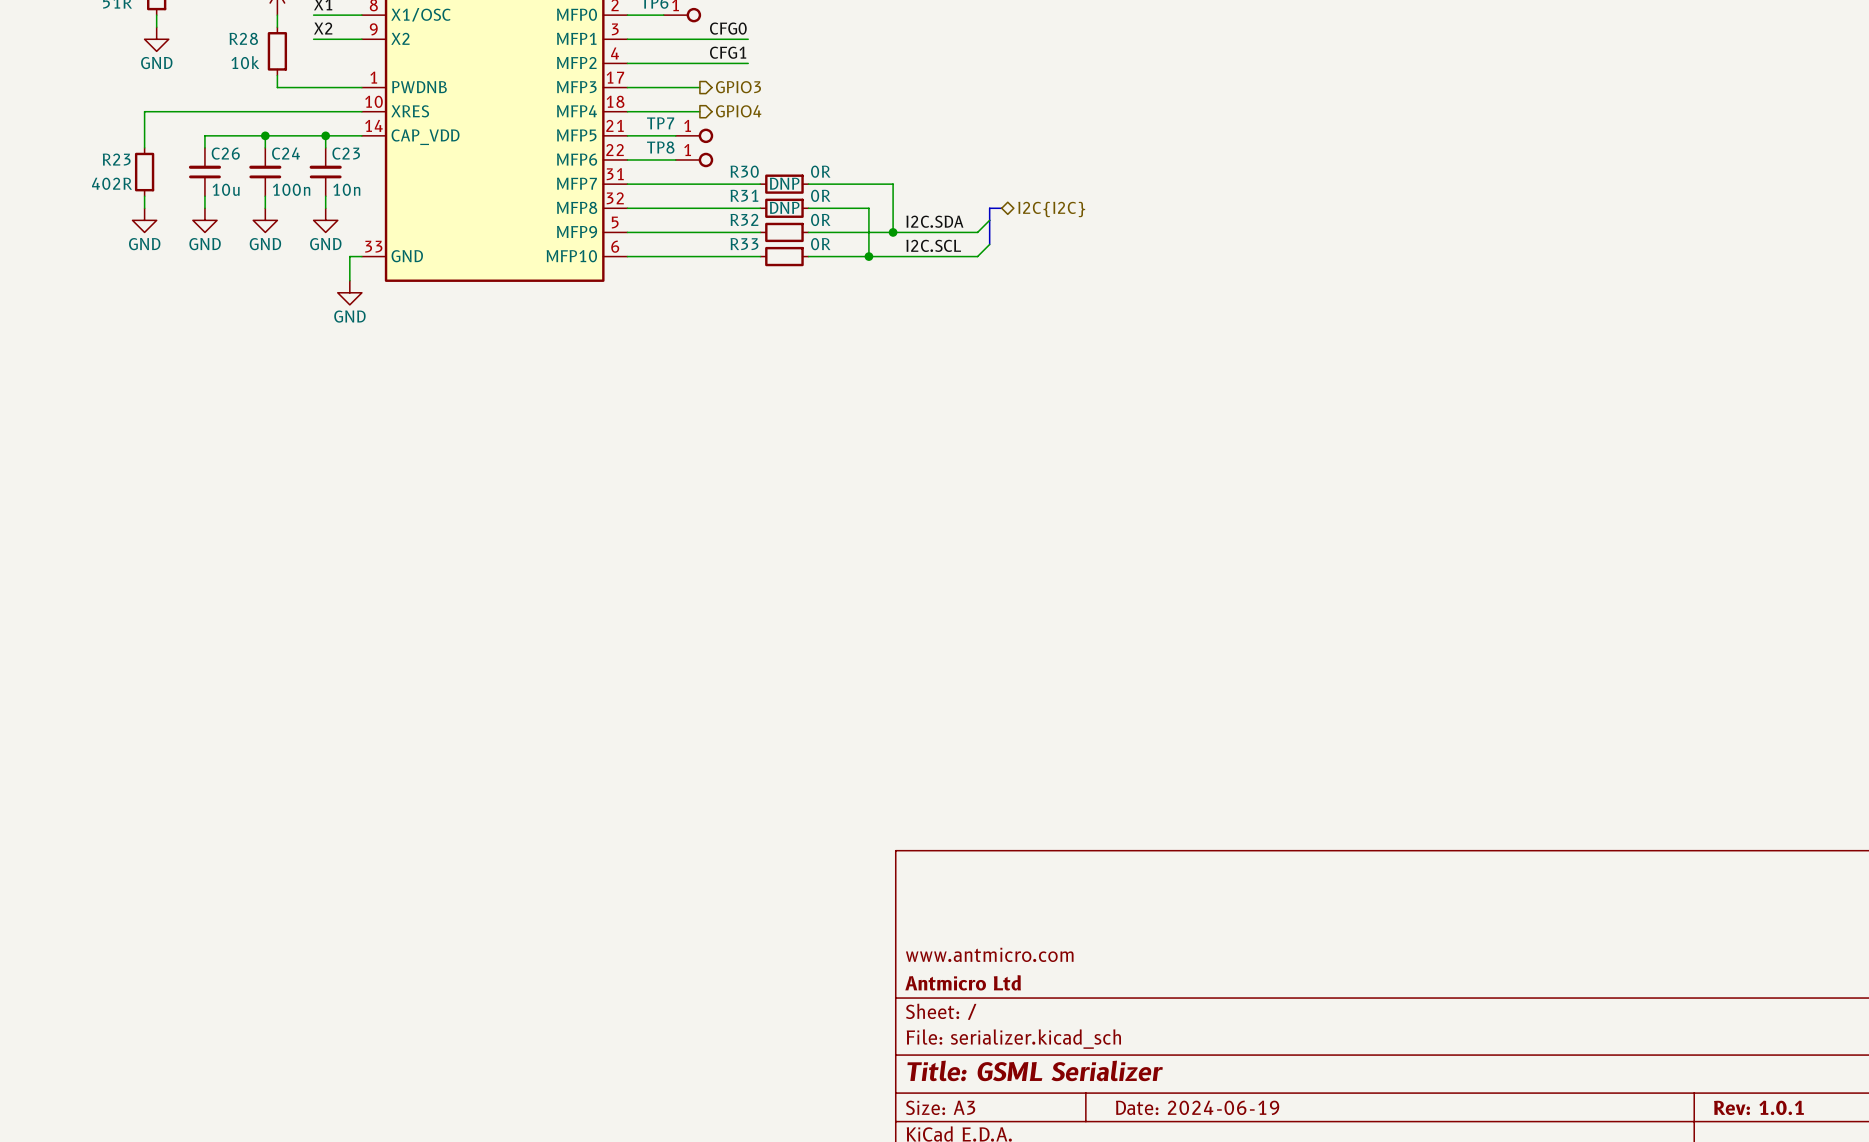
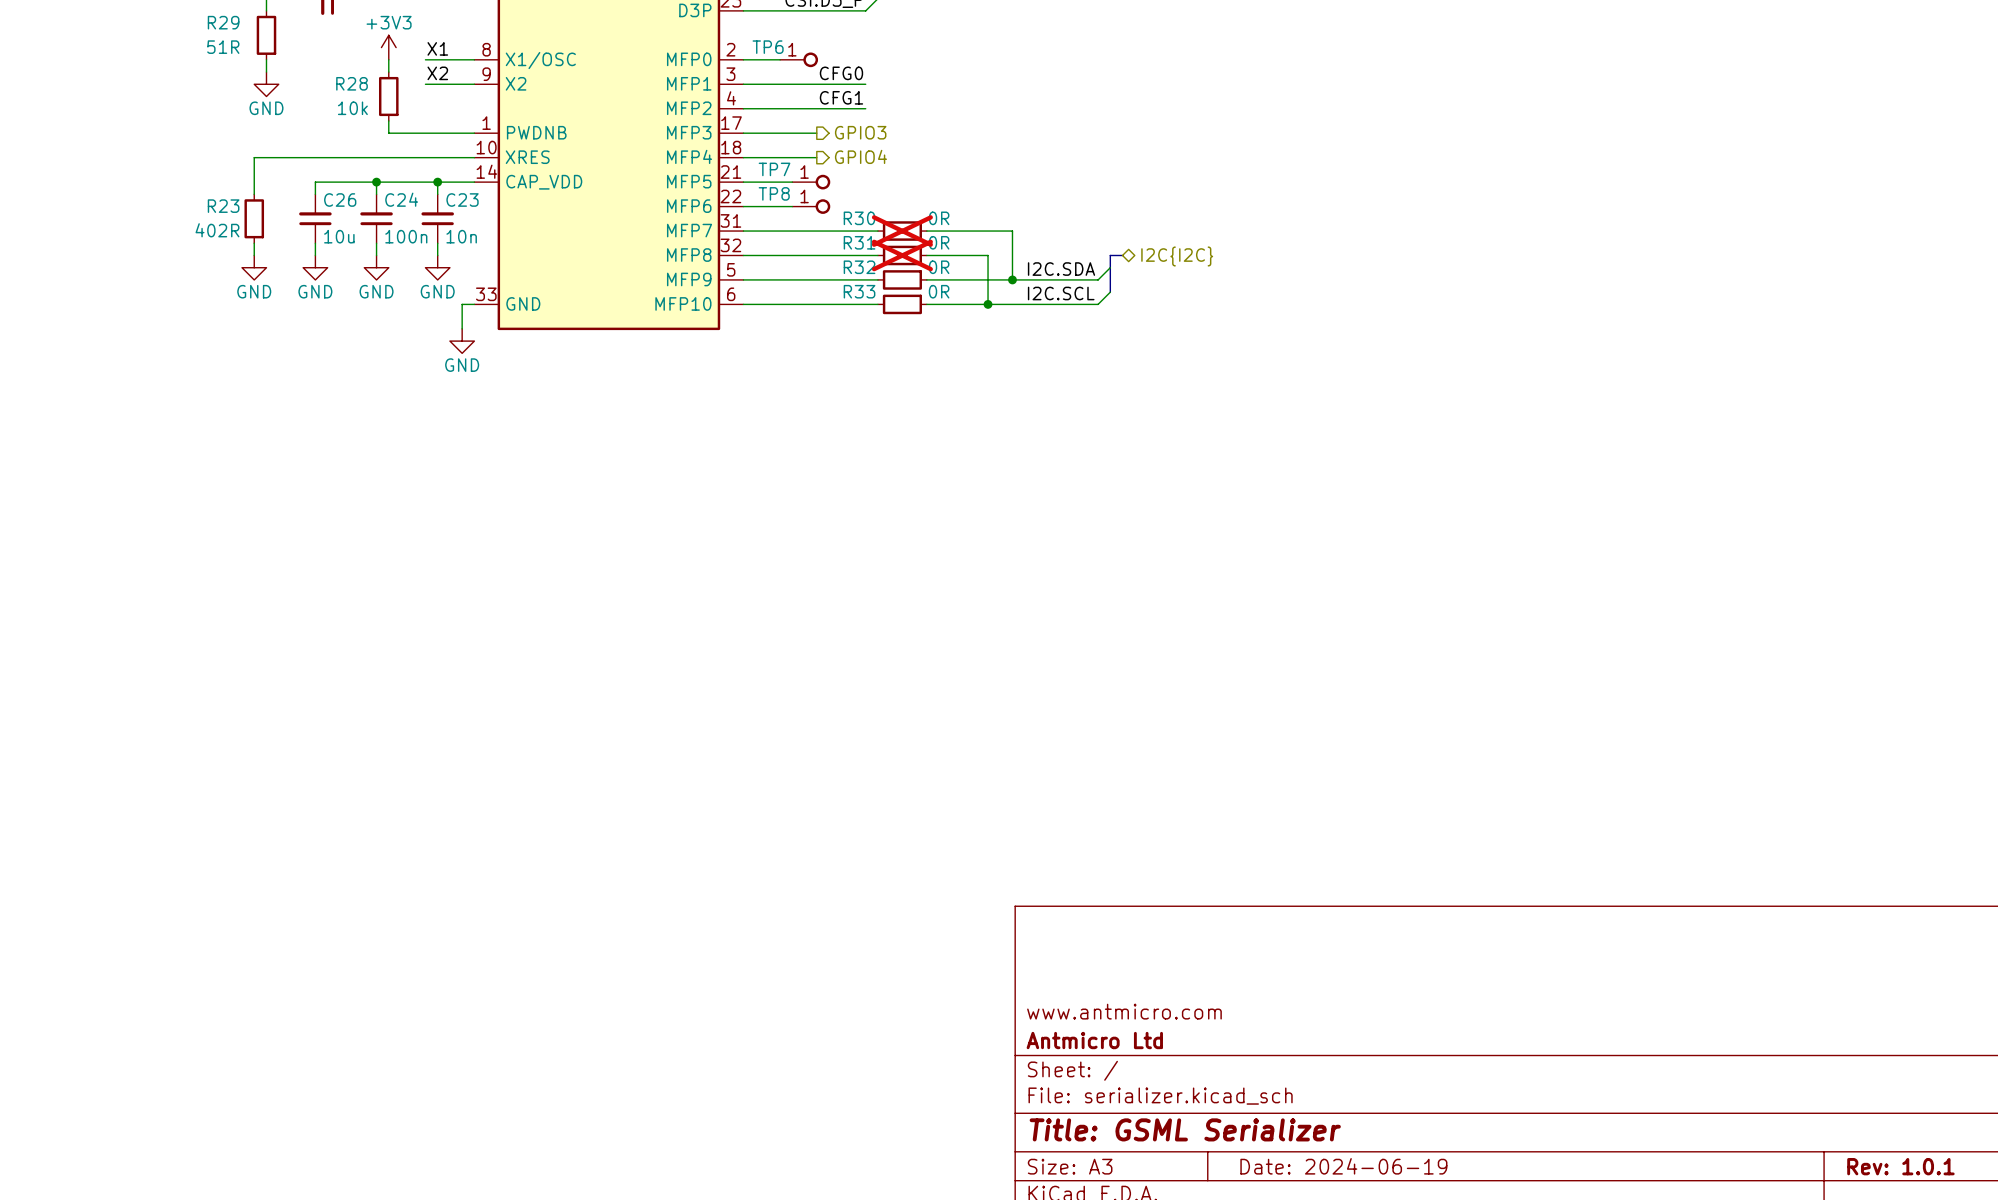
R30 text: DNP (784, 183) -> none
R30 do-not-place cross: none -> (902, 231)
R31 text: DNP (784, 207) -> none
R31 do-not-place cross: none -> (902, 255)

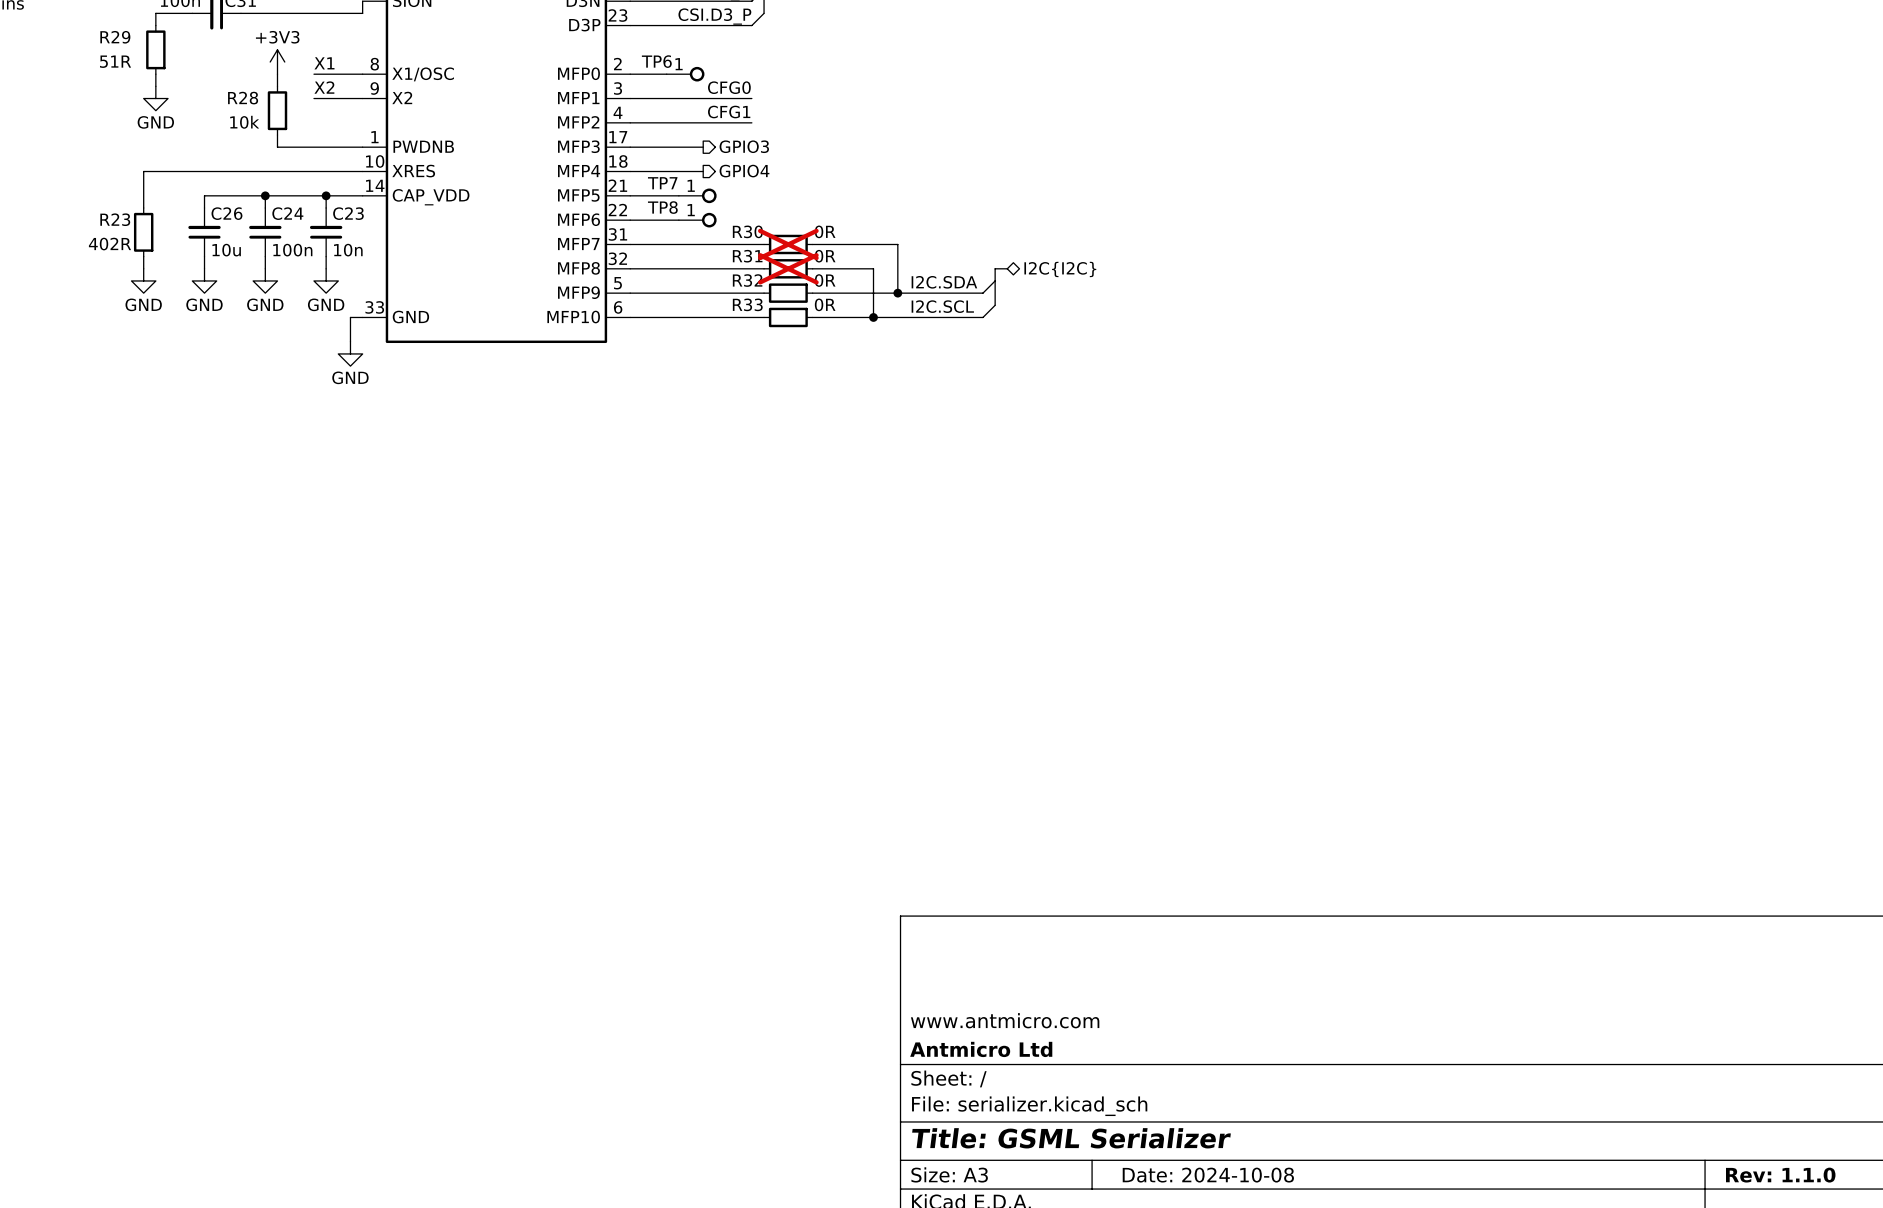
title block: Date: 2024-06-19 (1343, 1166) -> Date: 2024-10-08 (1208, 1175)
title block: Rev: 1.0.1 (1900, 1166) -> Rev: 1.1.0 (1780, 1175)

